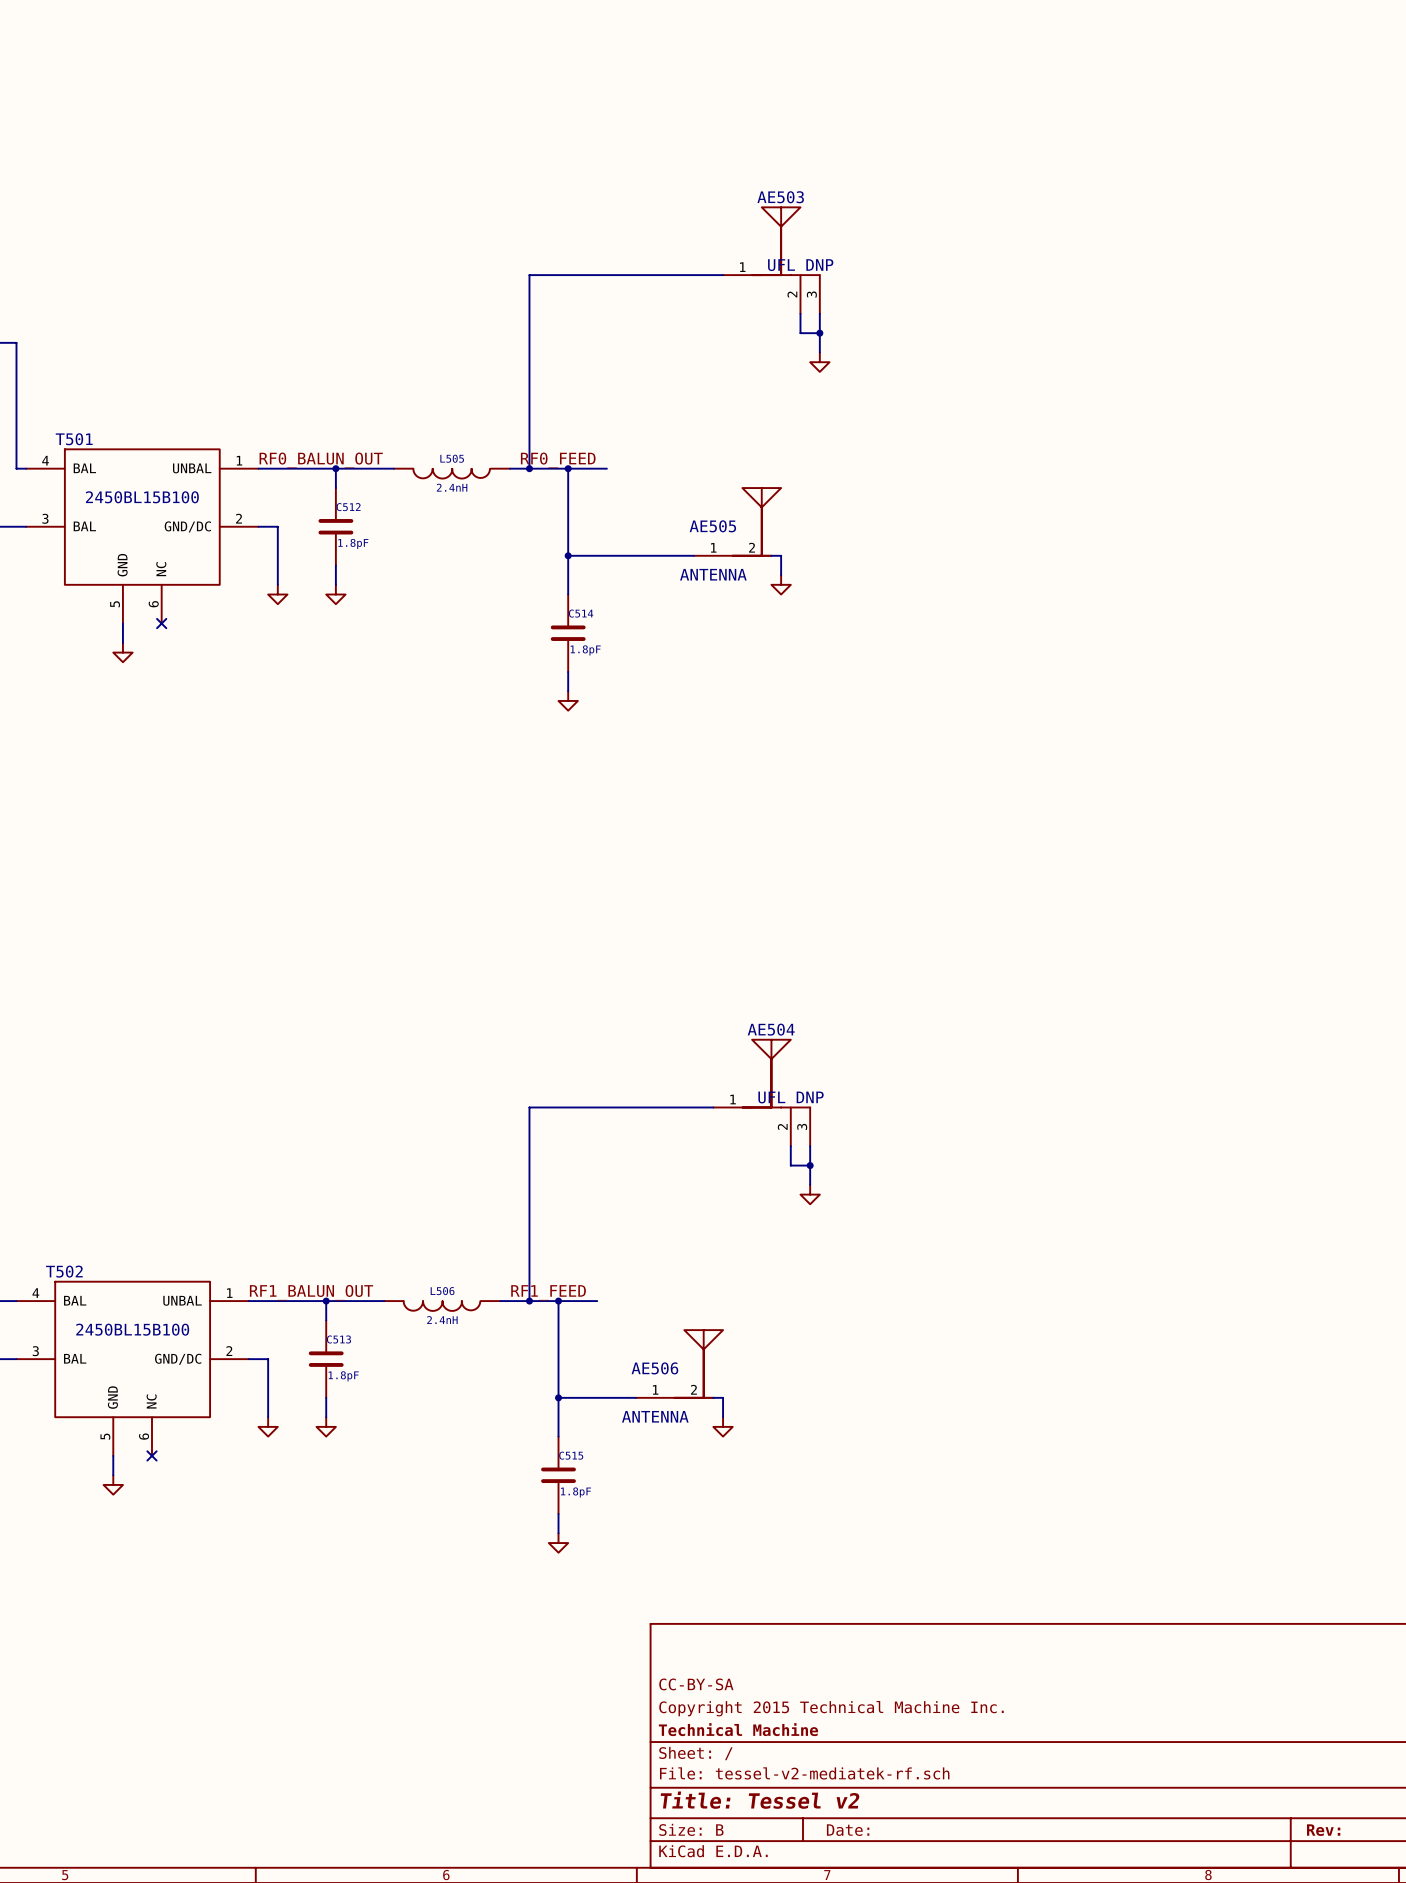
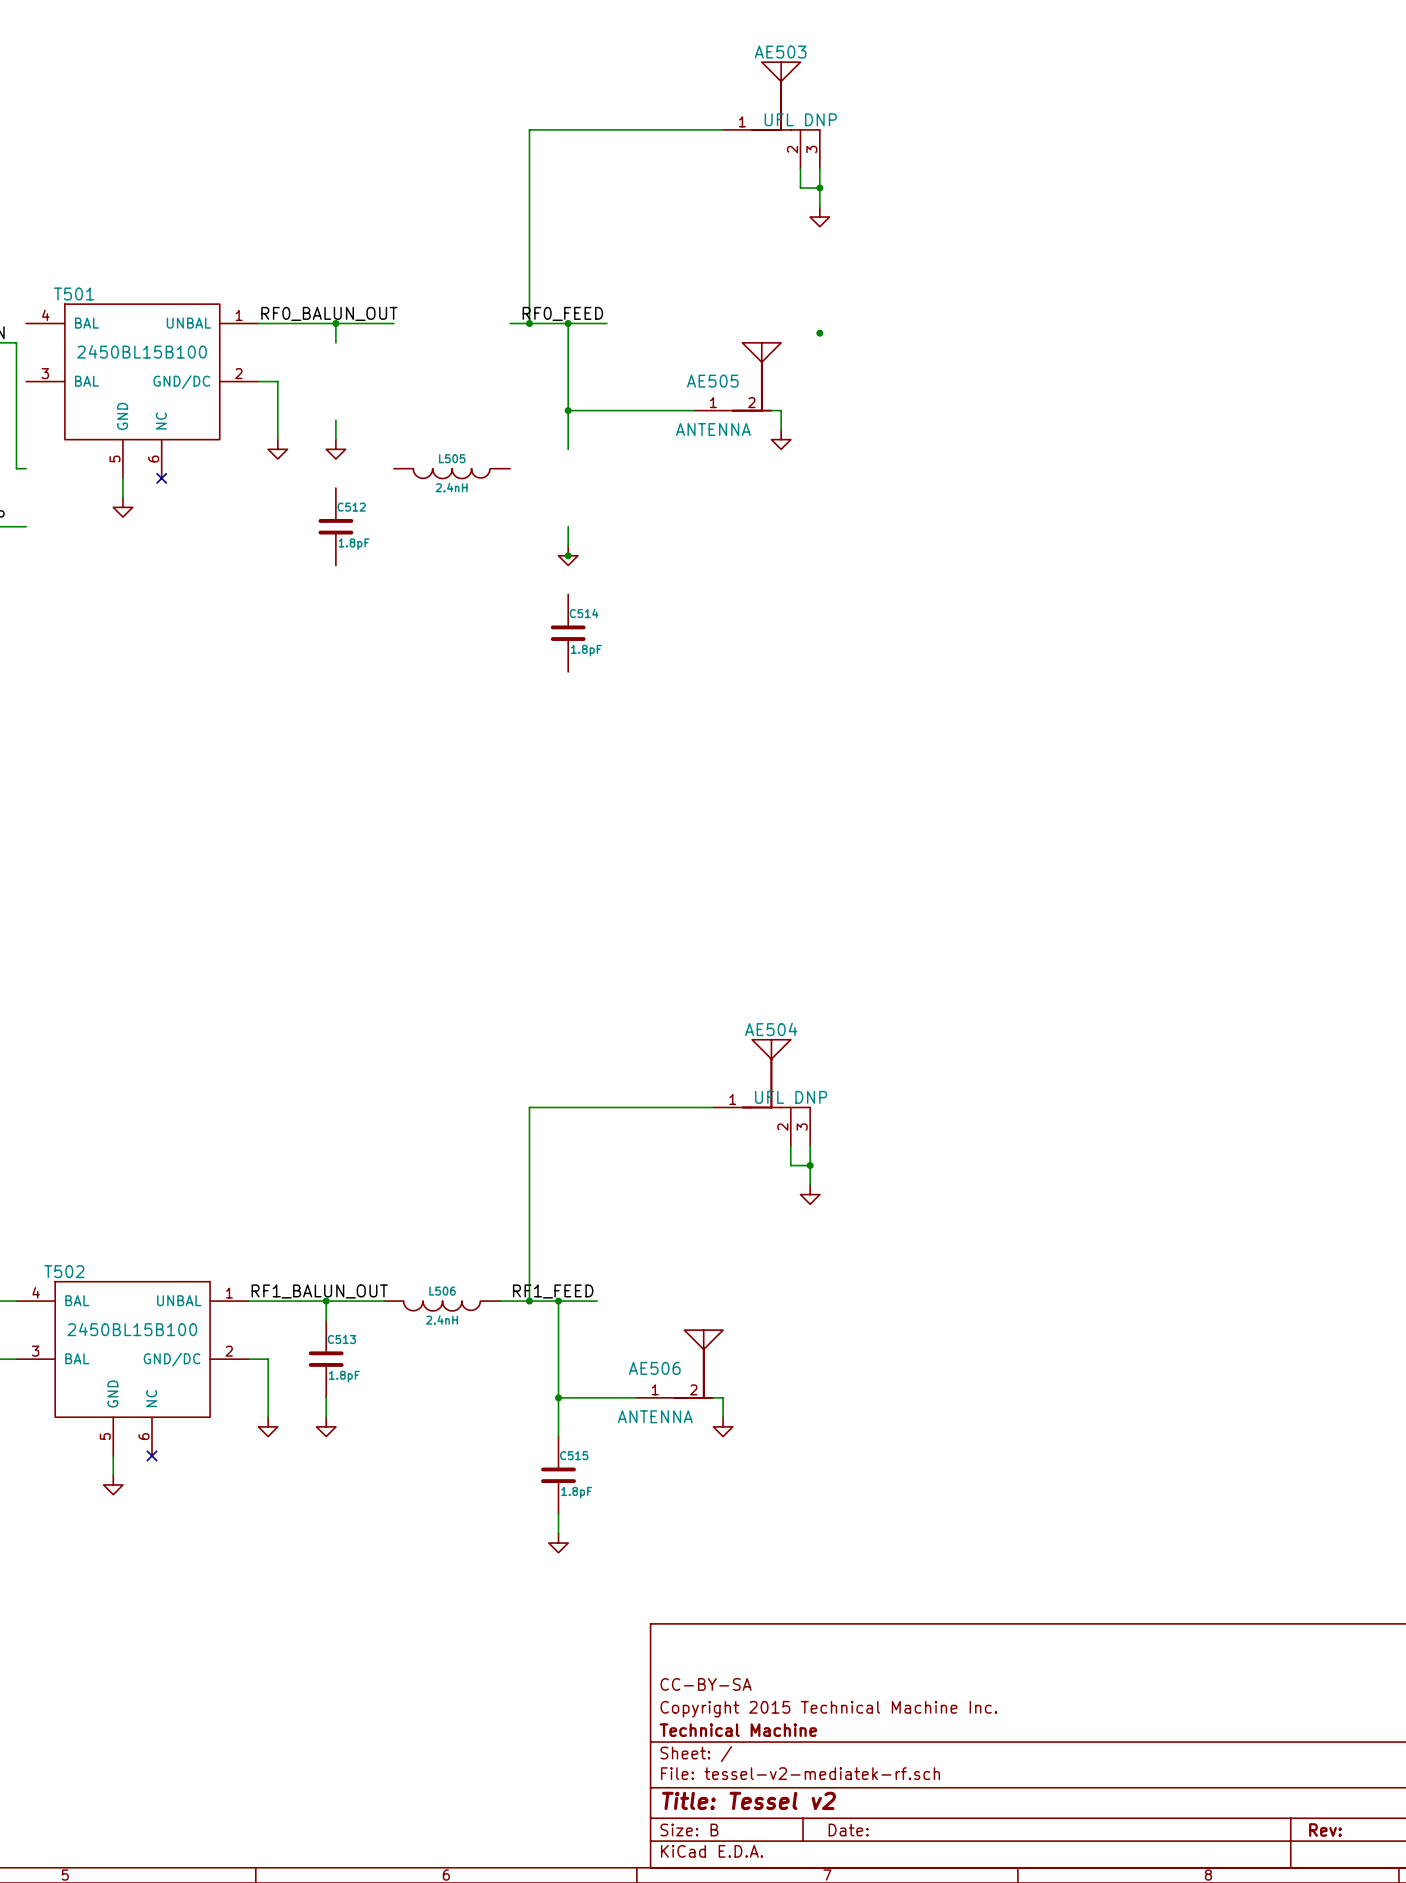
junction: none -> (819, 187)
power symbol: none -> (819, 217)
AE503 position: (771, 260) -> (771, 115)
wire: (529, 275) (723, 275) -> (529, 275) (529, 129) (723, 129)
wire: (800, 313) (800, 333) (819, 333) -> (800, 168) (800, 187) (819, 187)
wire: (819, 313) (819, 352) -> (819, 168) (819, 207)
junction: none -> (335, 323)
wire: (529, 323) (529, 468) -> none
junction: none -> (529, 323)
wire: none -> (568, 323) (568, 449)
junction: none -> (568, 323)
power symbol: (819, 362) -> none
junction: none -> (568, 410)
power symbol: none -> (781, 439)
power symbol: none -> (277, 449)
power symbol: none -> (335, 449)
label position: RF0_BALUN_OUT (321, 460) -> RF0_BALUN_OUT (329, 313)
label position: RF0_FEED (558, 460) -> RF0_FEED (562, 313)
wire: (258, 468) (393, 468) -> (258, 323) (393, 323)
wire: (335, 468) (335, 488) -> (335, 323) (335, 342)
junction: (335, 468) -> none
wire: (510, 468) (606, 468) -> (510, 323) (606, 323)
junction: (529, 468) -> none
wire: (568, 468) (568, 526) -> none
junction: (568, 468) -> none
no-connect mark: none -> (161, 478)
power symbol: none -> (122, 507)
AE505 position: (737, 521) -> (737, 376)
wire: (258, 526) (277, 526) (277, 584) -> (258, 381) (277, 381) (277, 439)
T501 position: (142, 536) -> (142, 391)
wire: (568, 546) (568, 594) -> none
wire: (568, 555) (694, 555) -> (568, 410) (694, 410)
power symbol: none -> (568, 555)
wire: (771, 555) (781, 555) (781, 575) -> (771, 410) (781, 410) (781, 429)
wire: (335, 565) (335, 584) -> (335, 420) (335, 439)
power symbol: (781, 584) -> none
power symbol: (277, 594) -> none
power symbol: (335, 594) -> none
wire: (122, 623) (122, 642) -> (122, 478) (122, 497)
no-connect mark: (161, 623) -> none
power symbol: (122, 652) -> none
wire: (568, 671) (568, 691) -> none
power symbol: (568, 700) -> none

